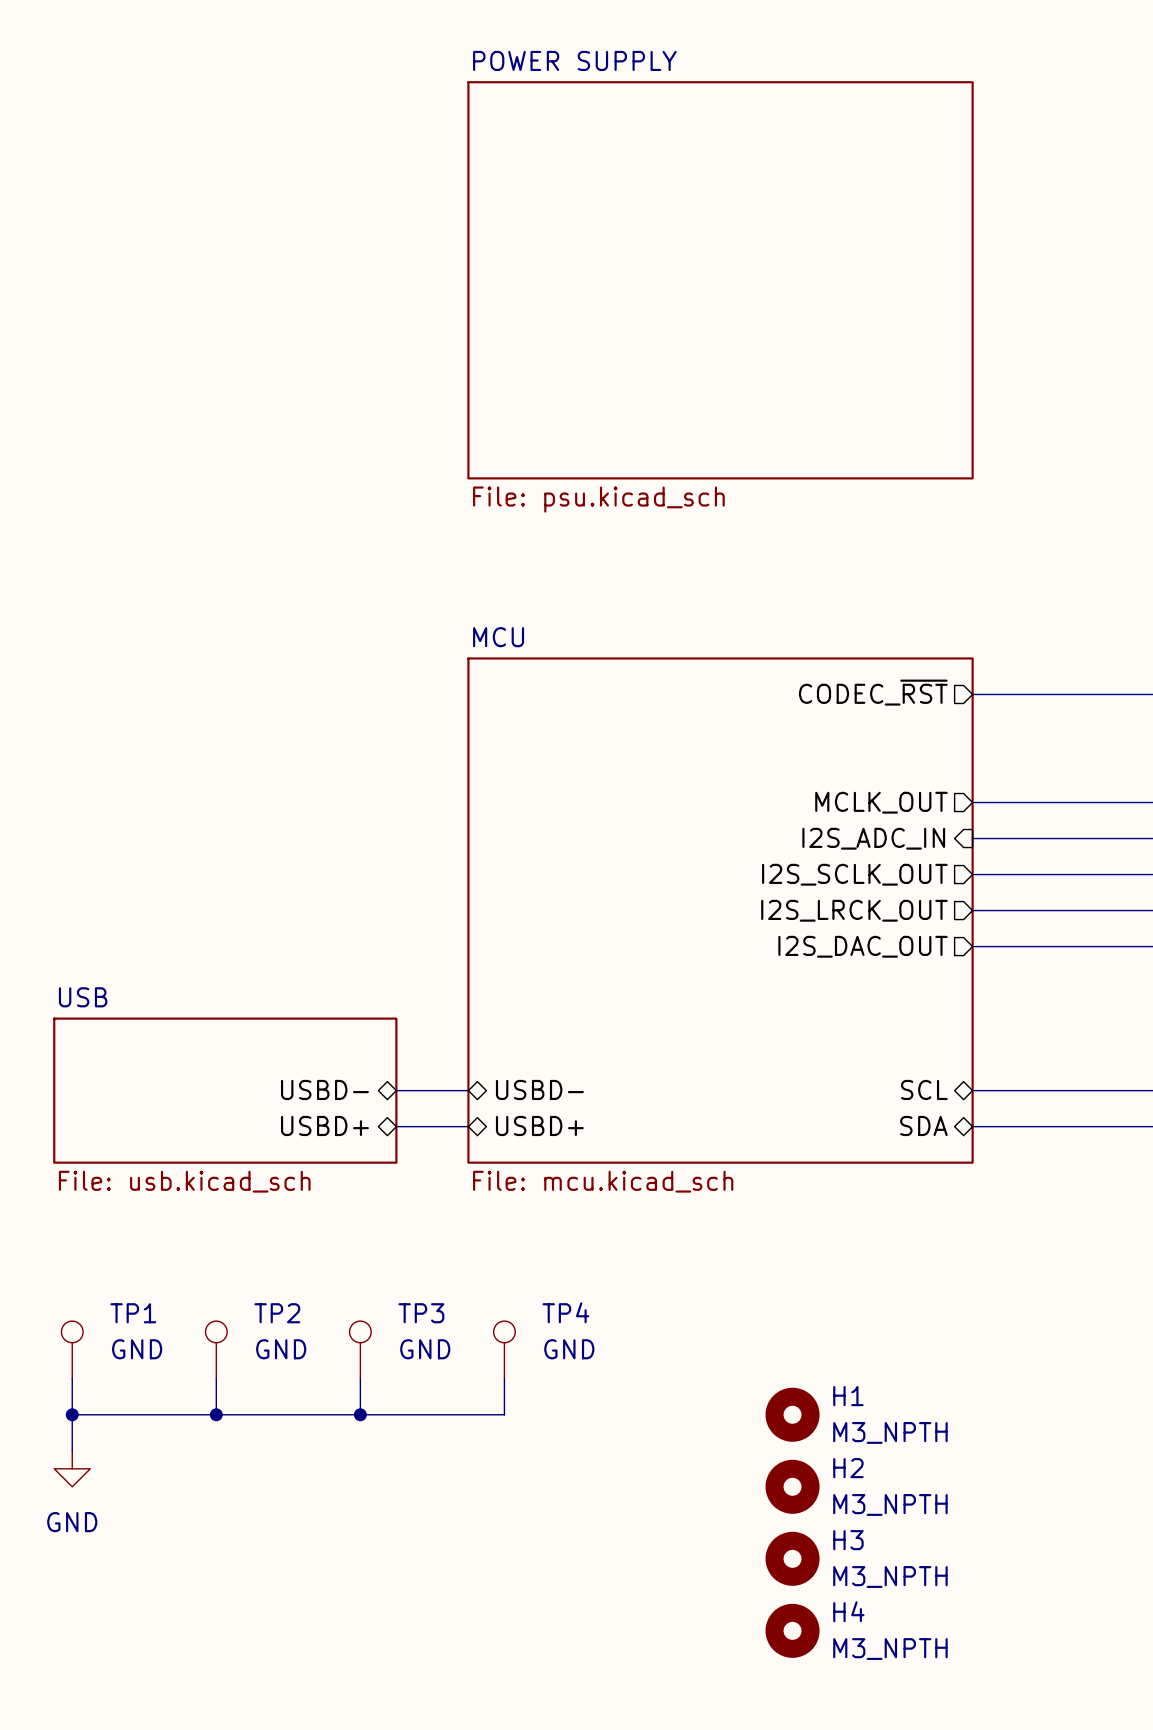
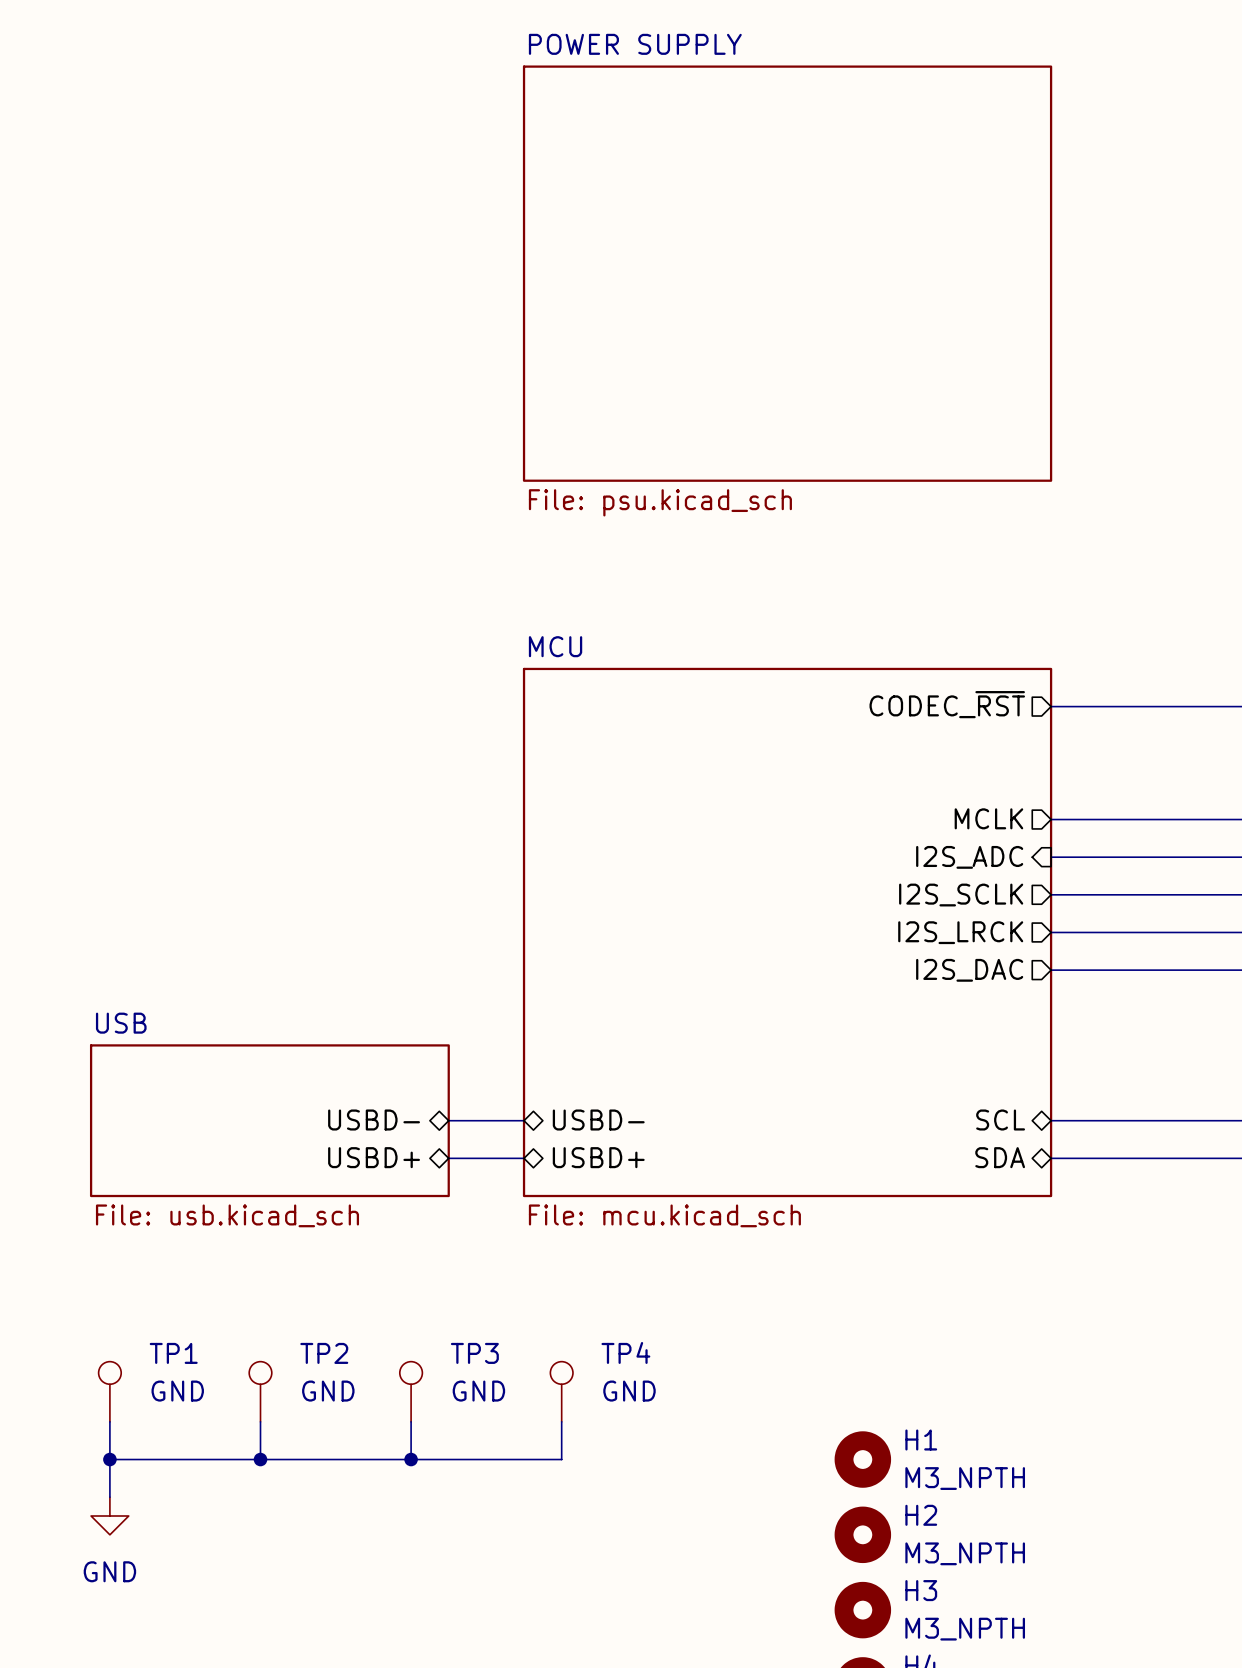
sheet pin: MCLK_OUT (881, 802) -> MCLK (988, 818)
sheet pin: I2S_ADC_IN (873, 838) -> I2S_ADC (969, 857)
sheet pin: I2S_SCLK_OUT (854, 874) -> I2S_SCLK (961, 895)
sheet pin: I2S_LRCK_OUT (854, 910) -> I2S_LRCK (960, 932)
sheet pin: I2S_DAC_OUT (863, 946) -> I2S_DAC (969, 970)

